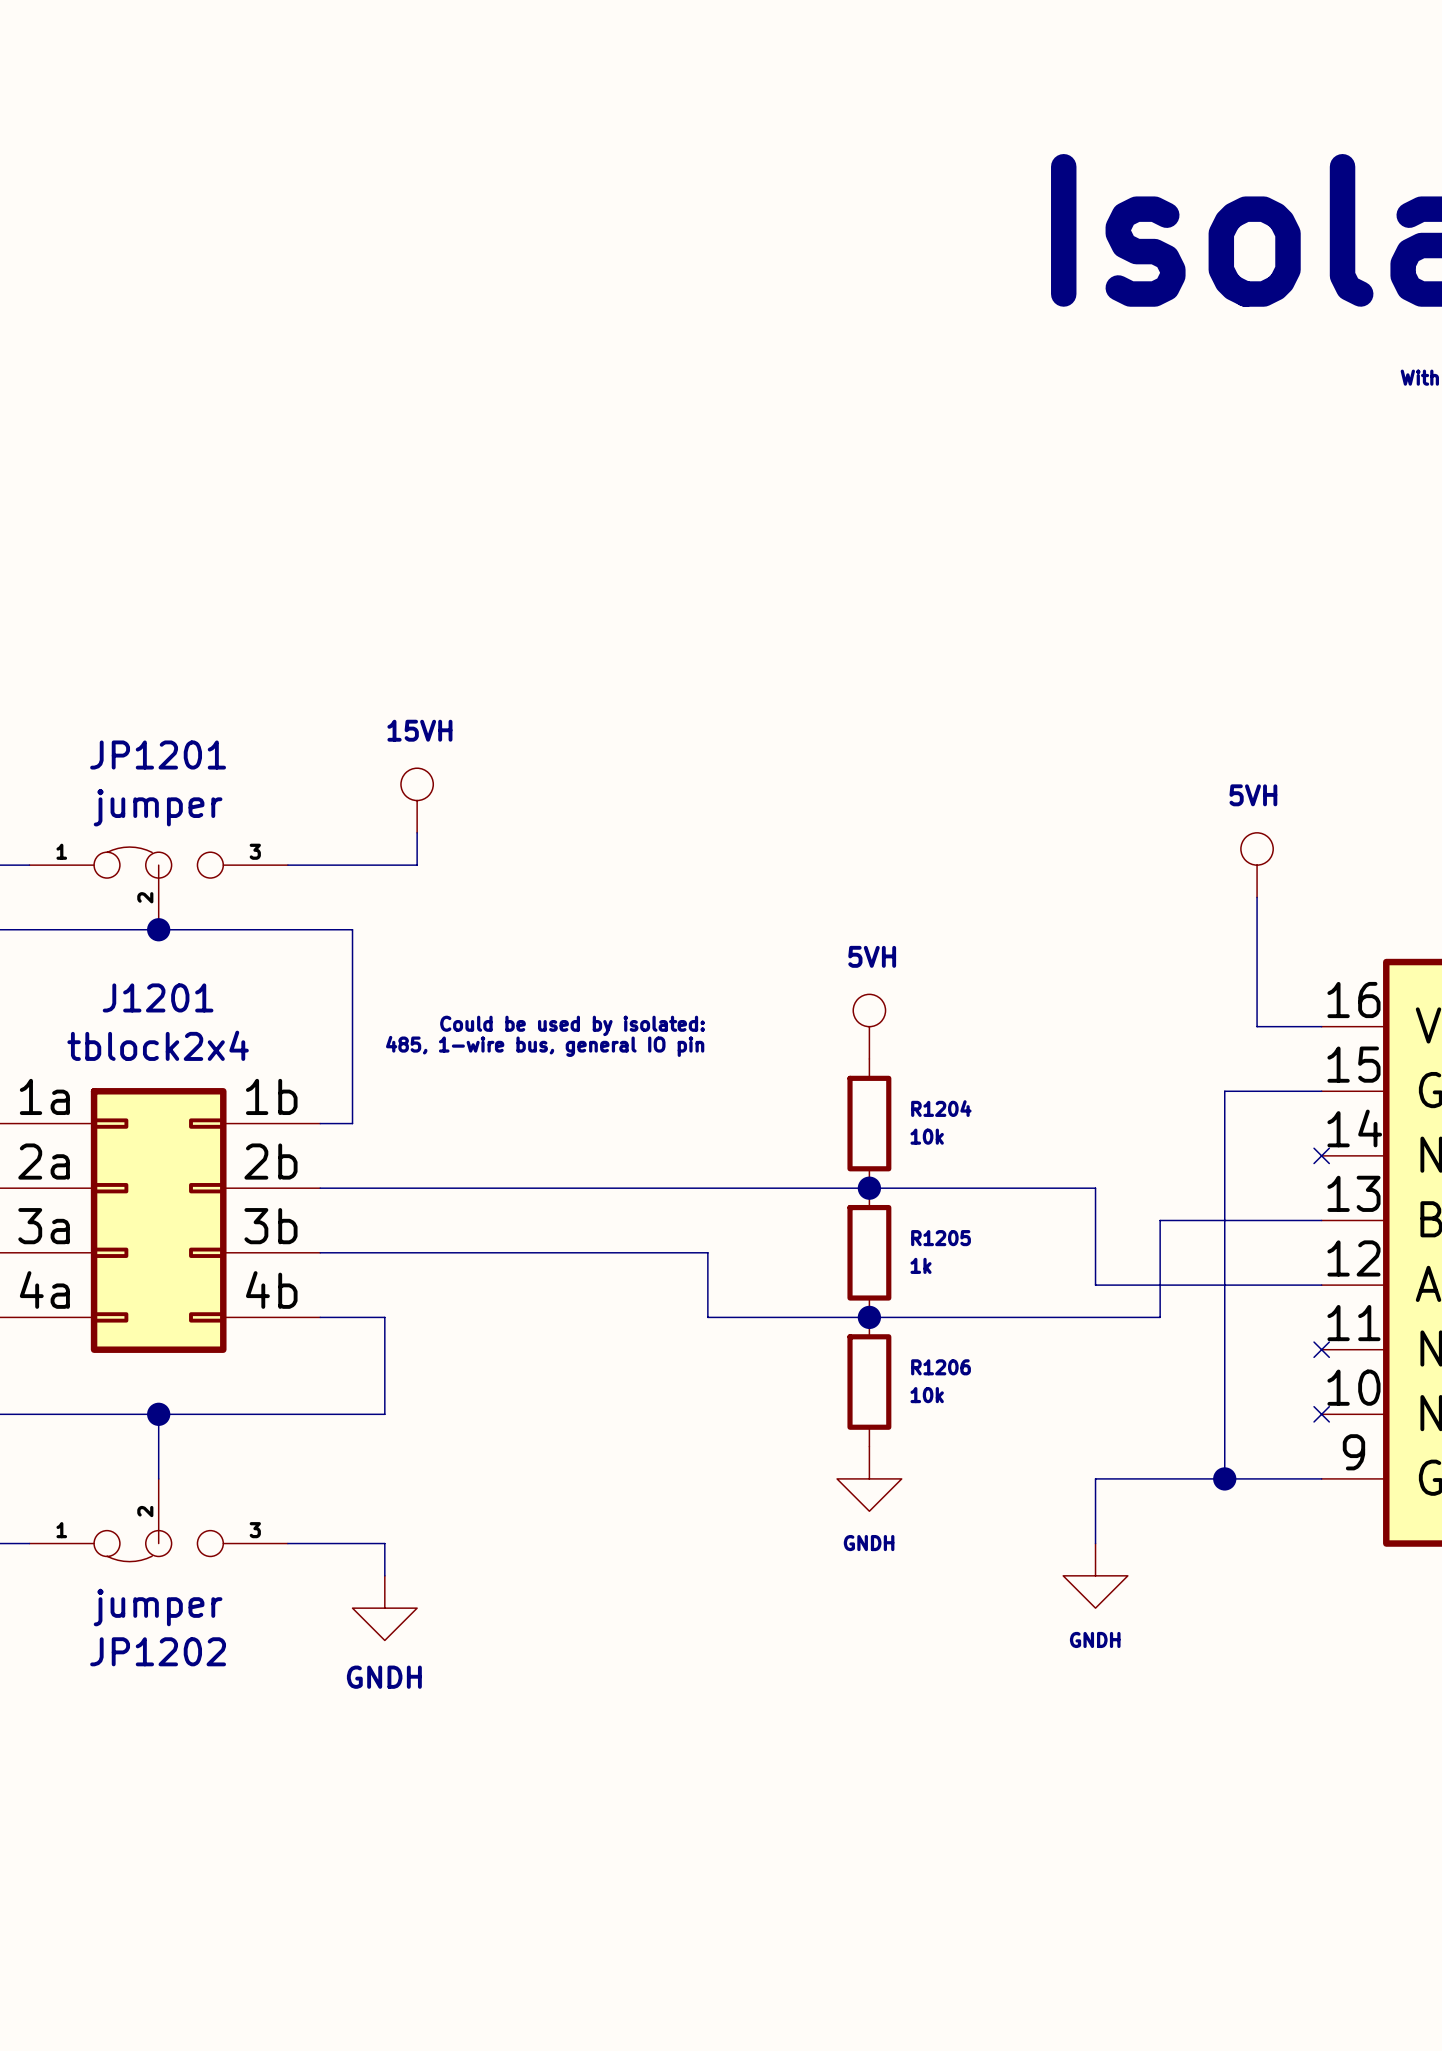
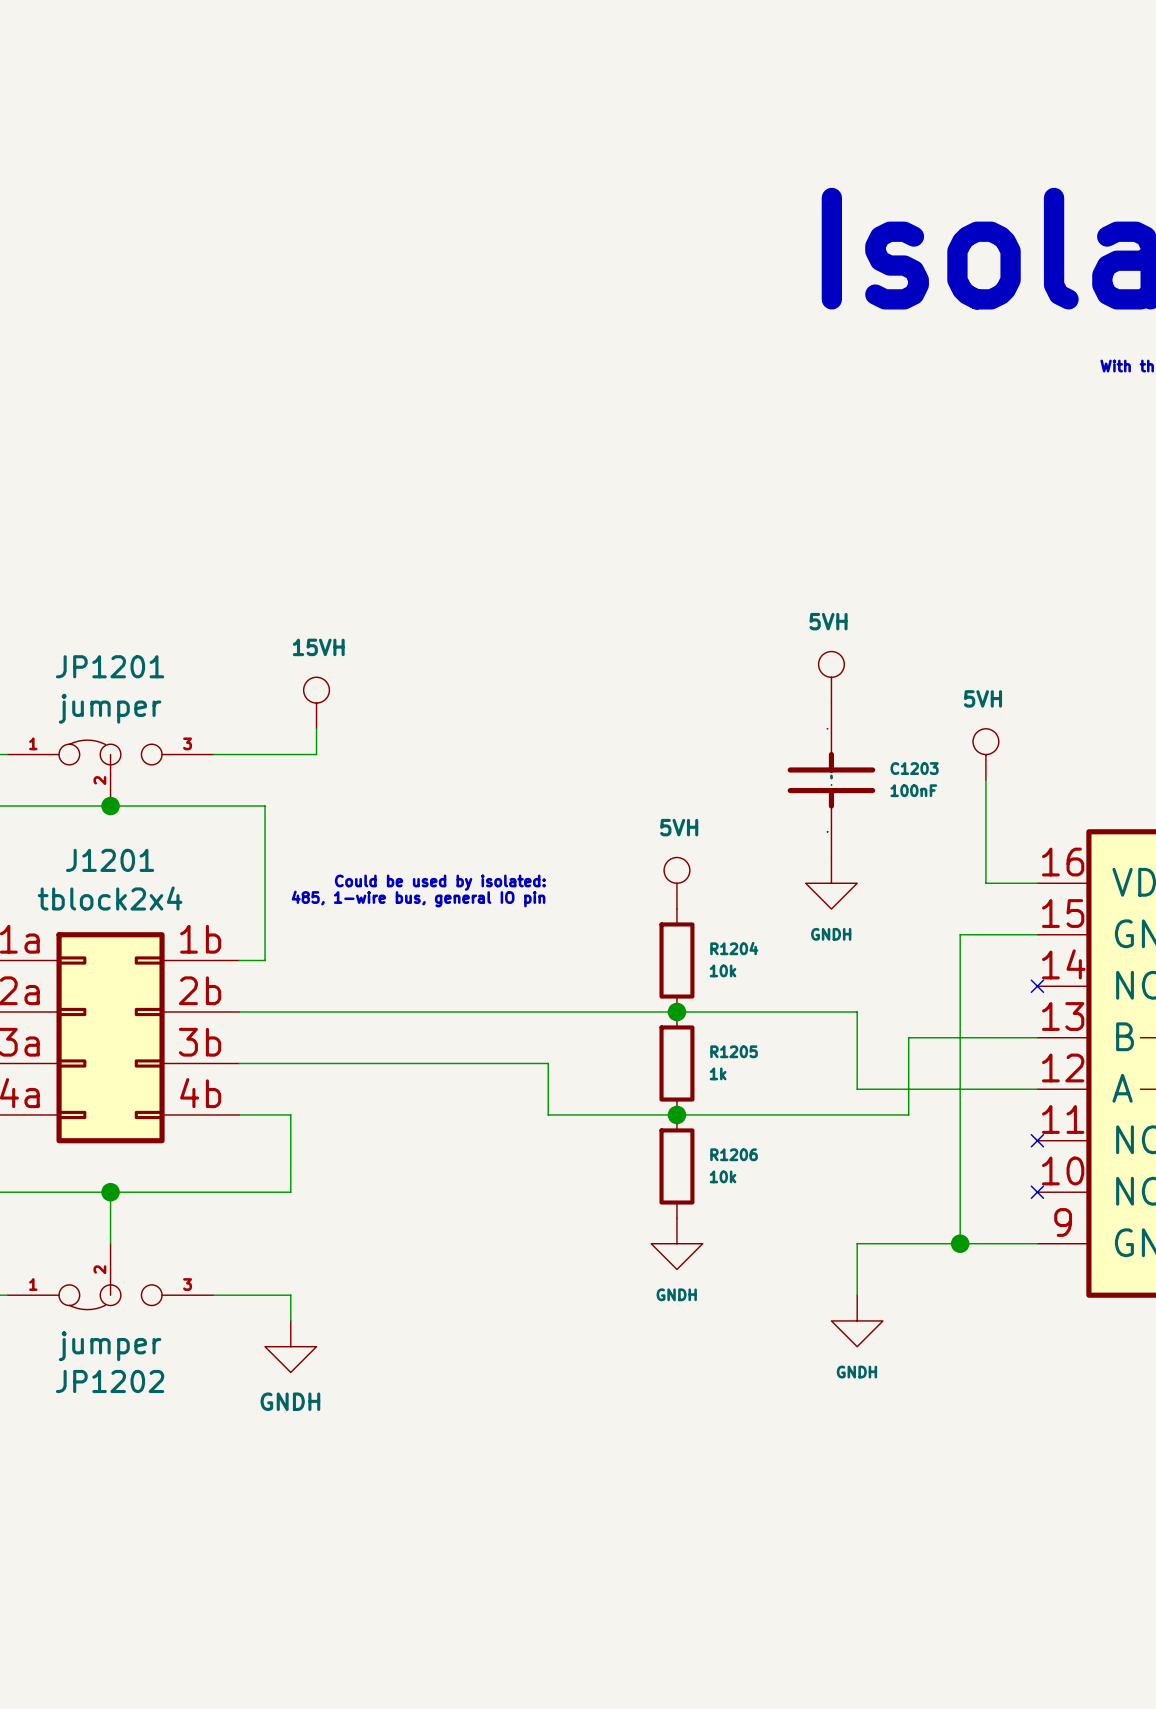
power symbol: none -> 5VH (831, 677)
C1203: none -> 100nF (831, 780)
power symbol: none -> GNDH (831, 883)

